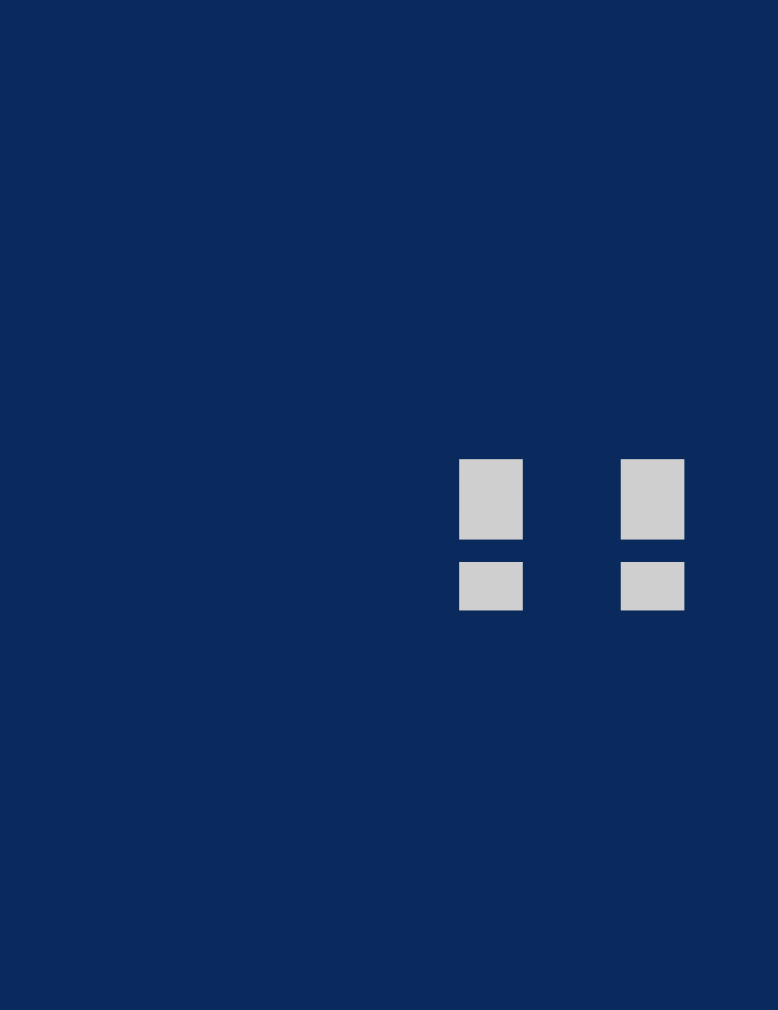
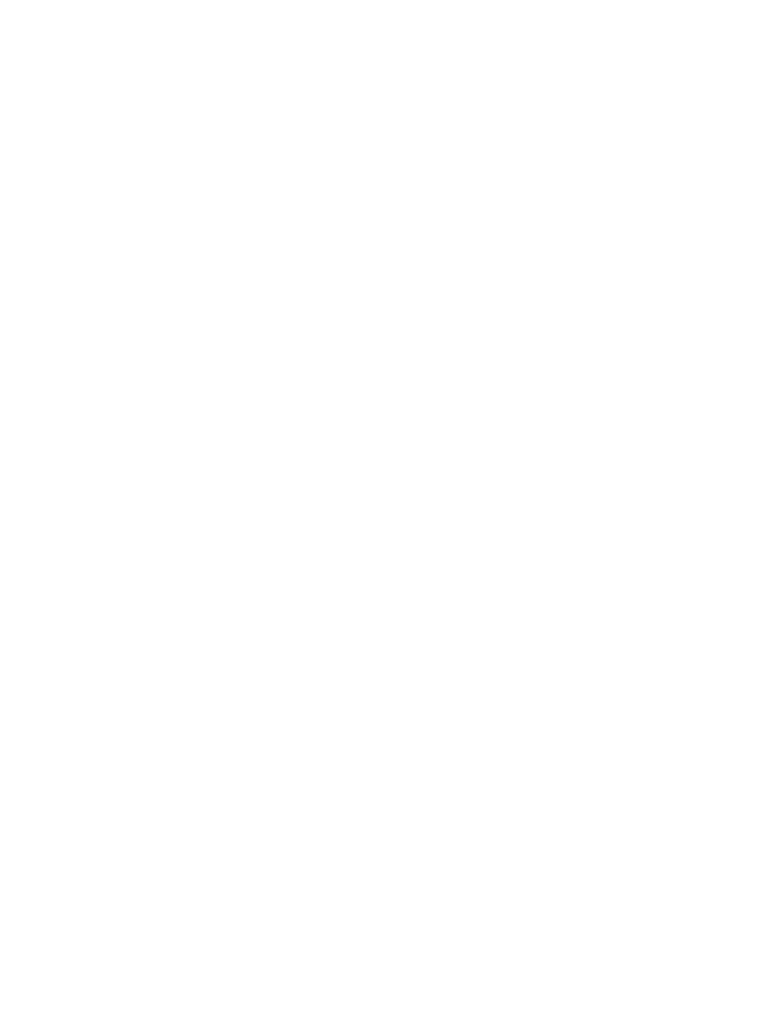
part: (490, 534) -> none
part: (652, 534) -> none

